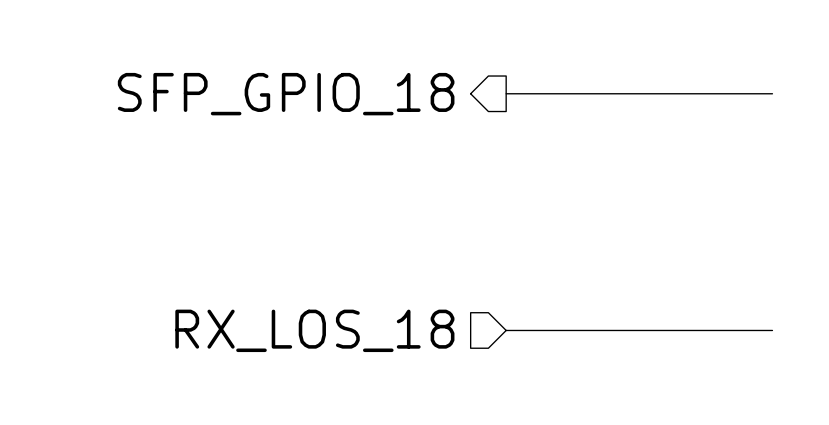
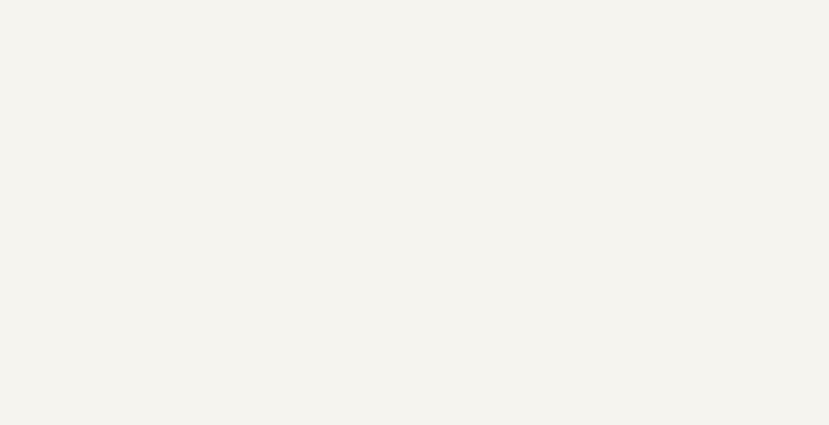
wire: (506, 93) (772, 93) -> none
hierarchical label: SFP_GPIO_18 (286, 94) -> none
hierarchical label: RX_LOS_18 (314, 330) -> none
wire: (506, 330) (772, 330) -> none

